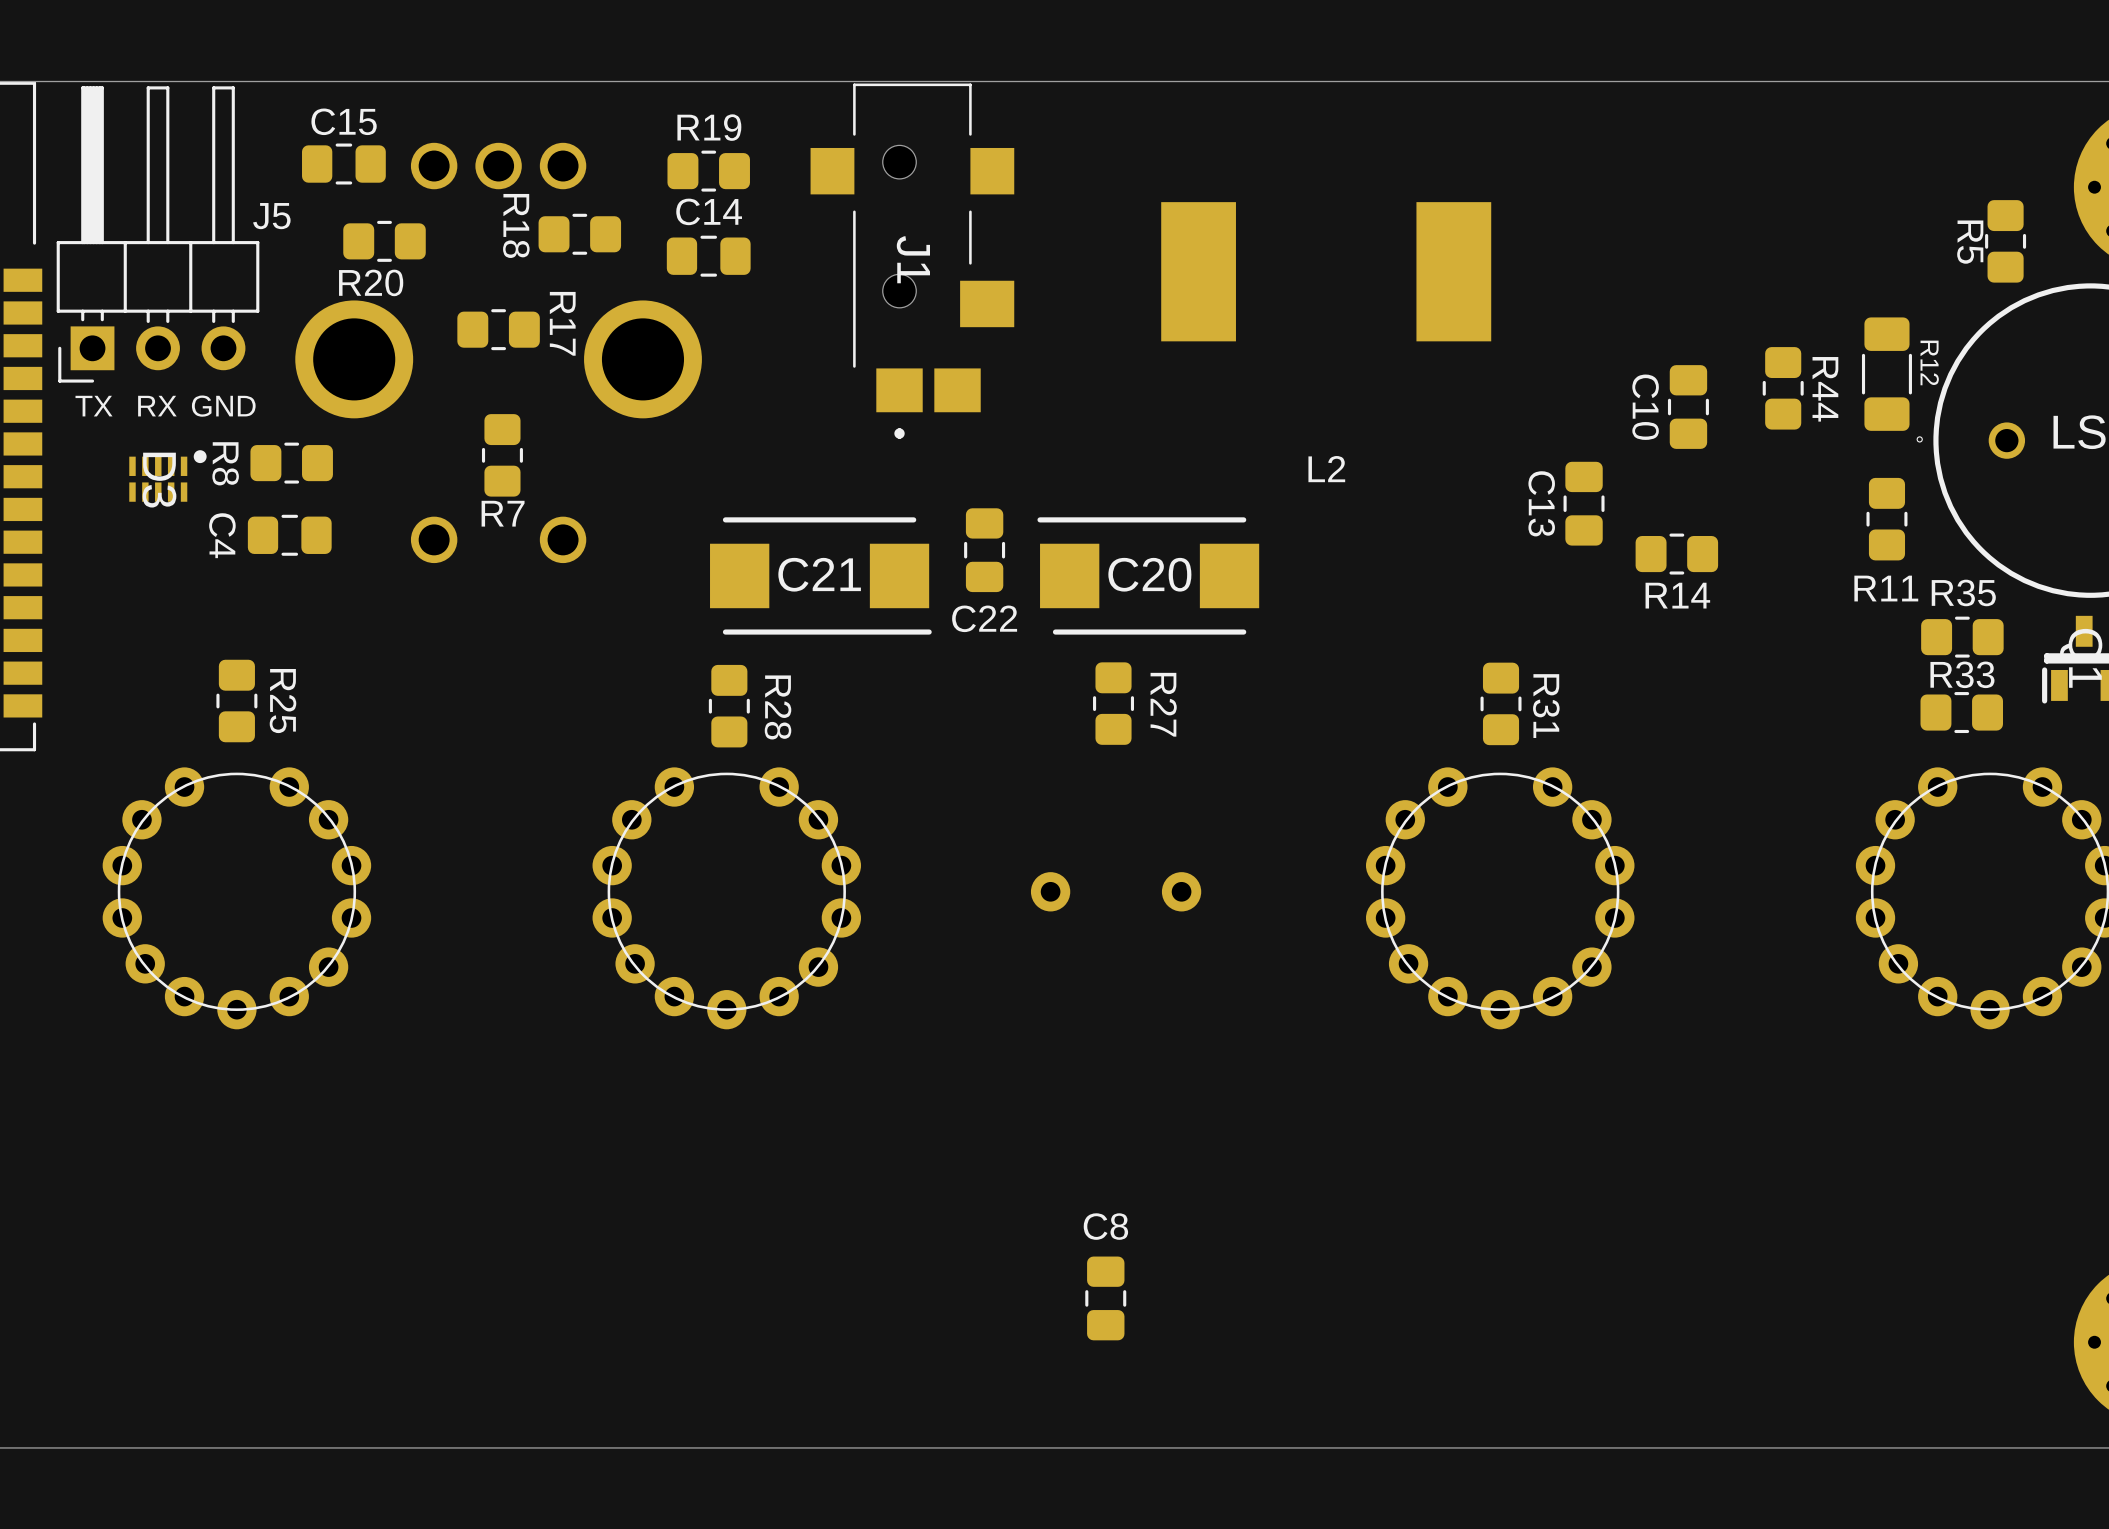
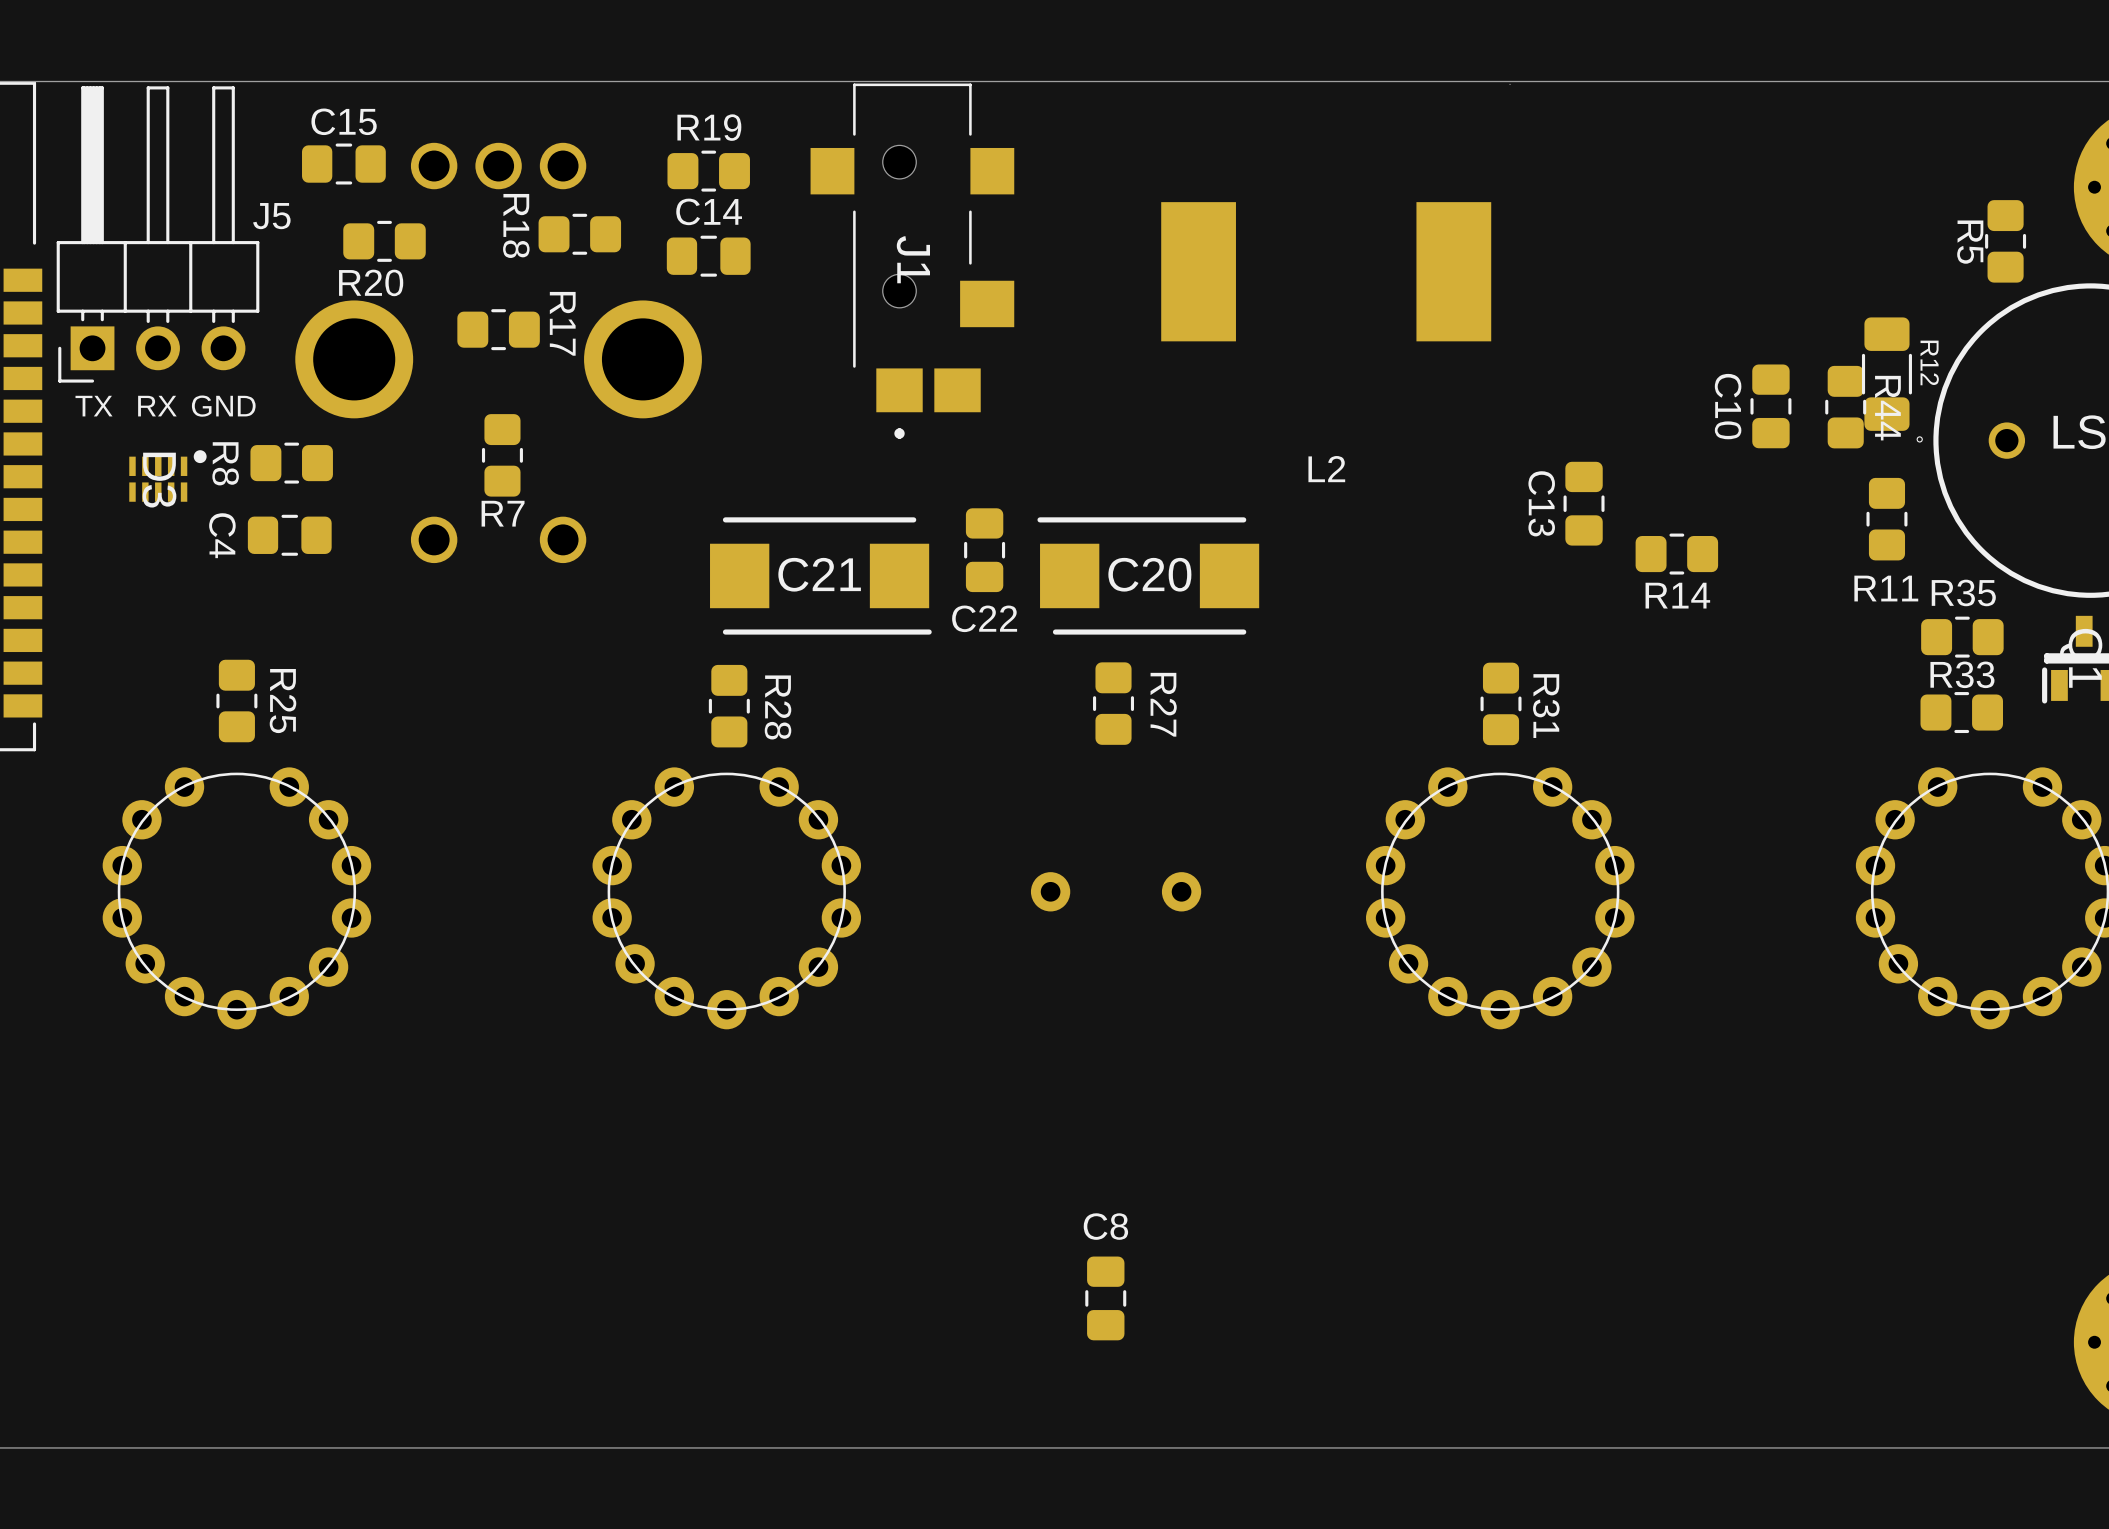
R44 position: (1783, 388) -> (1845, 407)
C10 position: (1688, 407) -> (1770, 406)

